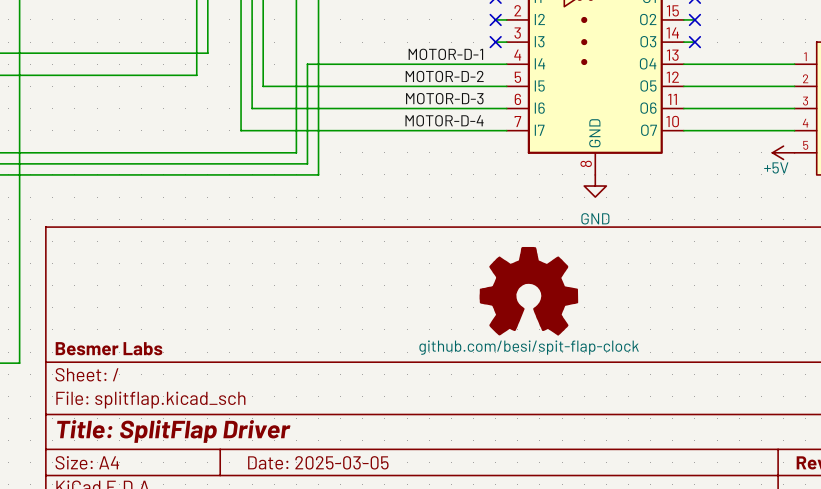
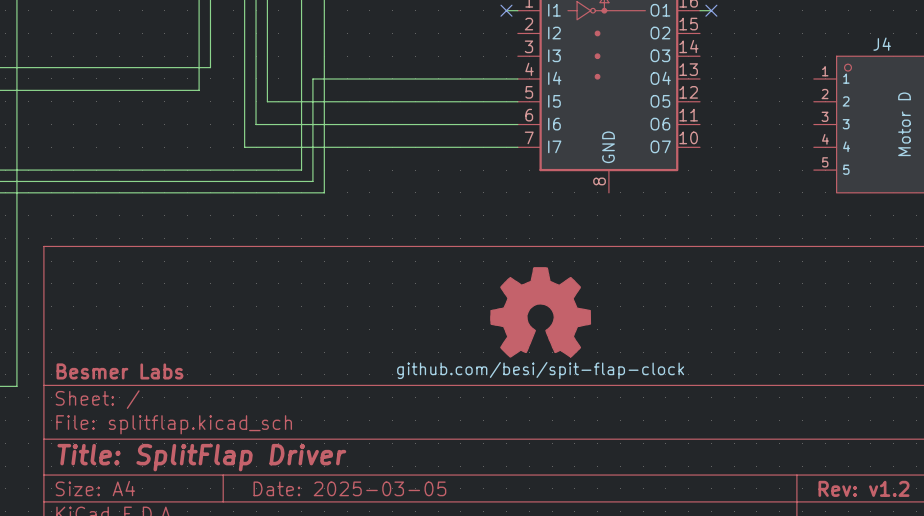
wire: (495, 19) (506, 19) -> none
no-connect mark: (495, 19) -> none
wire: (683, 19) (694, 19) -> none
no-connect mark: (694, 19) -> none
wire: (495, 42) (506, 42) -> none
no-connect mark: (495, 42) -> none
wire: (683, 42) (694, 42) -> none
no-connect mark: (694, 42) -> none
label: MOTOR-D-1 (445, 54) -> none
wire: (683, 64) (794, 64) -> none
label: MOTOR-D-2 (444, 76) -> none
wire: (683, 86) (794, 86) -> none
label: MOTOR-D-3 (444, 98) -> none
wire: (683, 108) (794, 108) -> none
label: MOTOR-D-4 (444, 120) -> none
wire: (683, 130) (794, 130) -> none
power symbol: +5V (783, 152) -> none
power symbol: GND (595, 186) -> none

